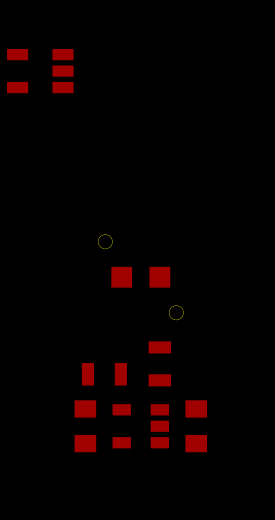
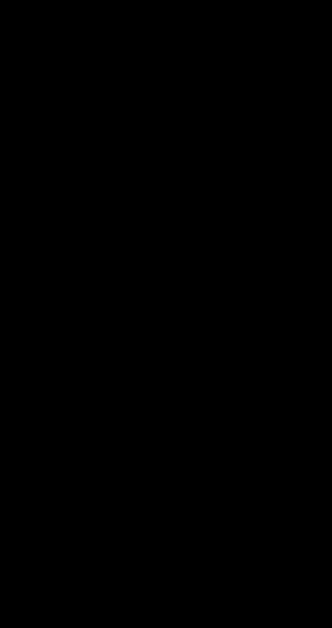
part: (40, 71) -> none
part: (140, 277) -> none
part: (159, 363) -> none
part: (104, 374) -> none
part: (85, 426) -> none
part: (140, 426) -> none
part: (196, 426) -> none

